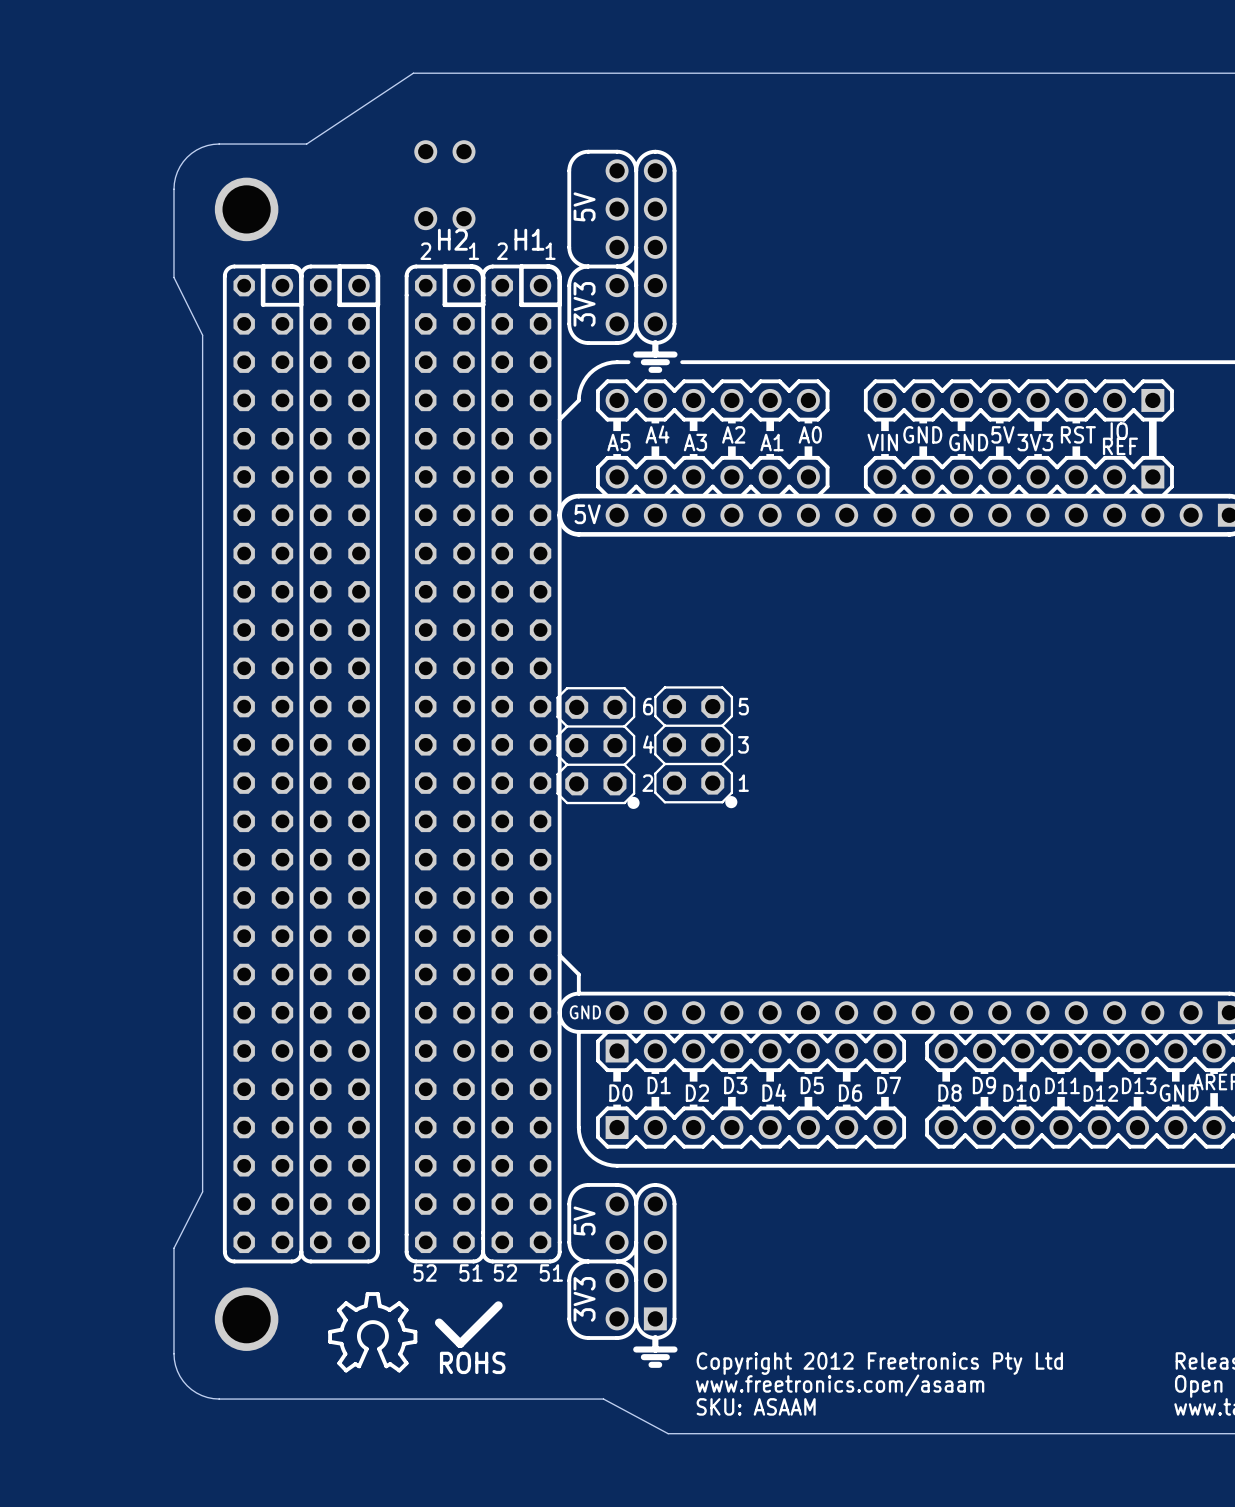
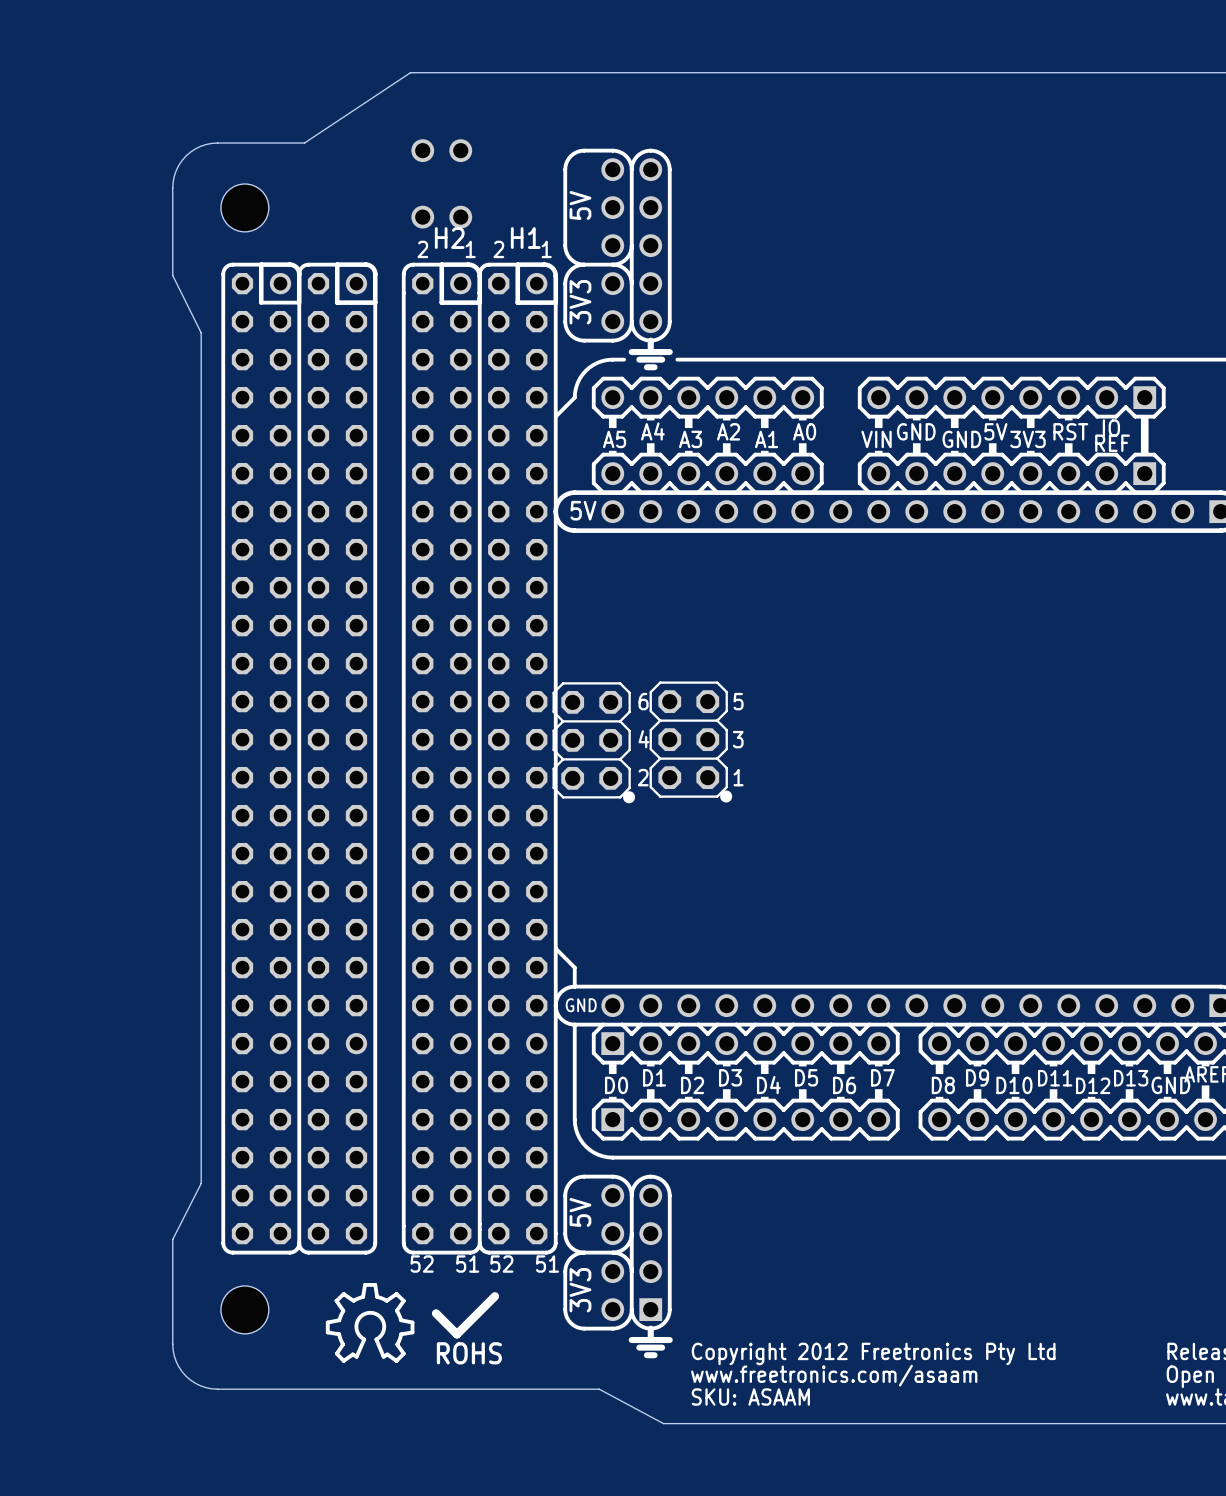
part: (246, 209) -> none
hole: none -> (244, 207)
part: (246, 1319) -> none
hole: none -> (244, 1309)

